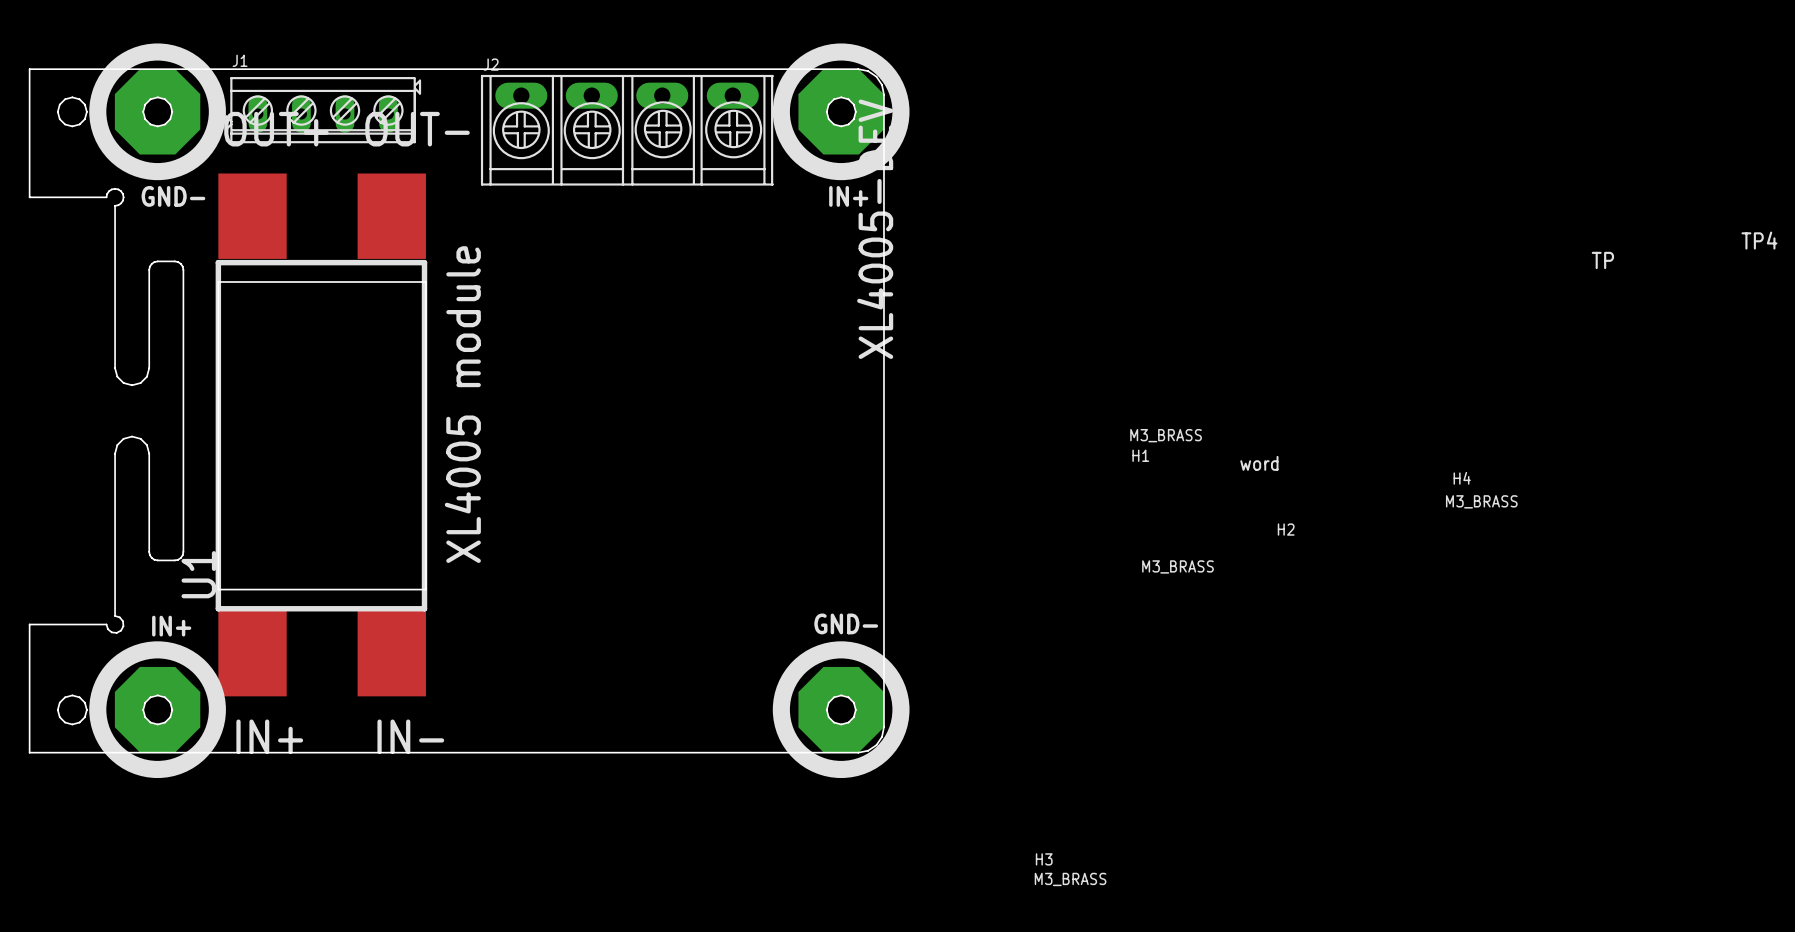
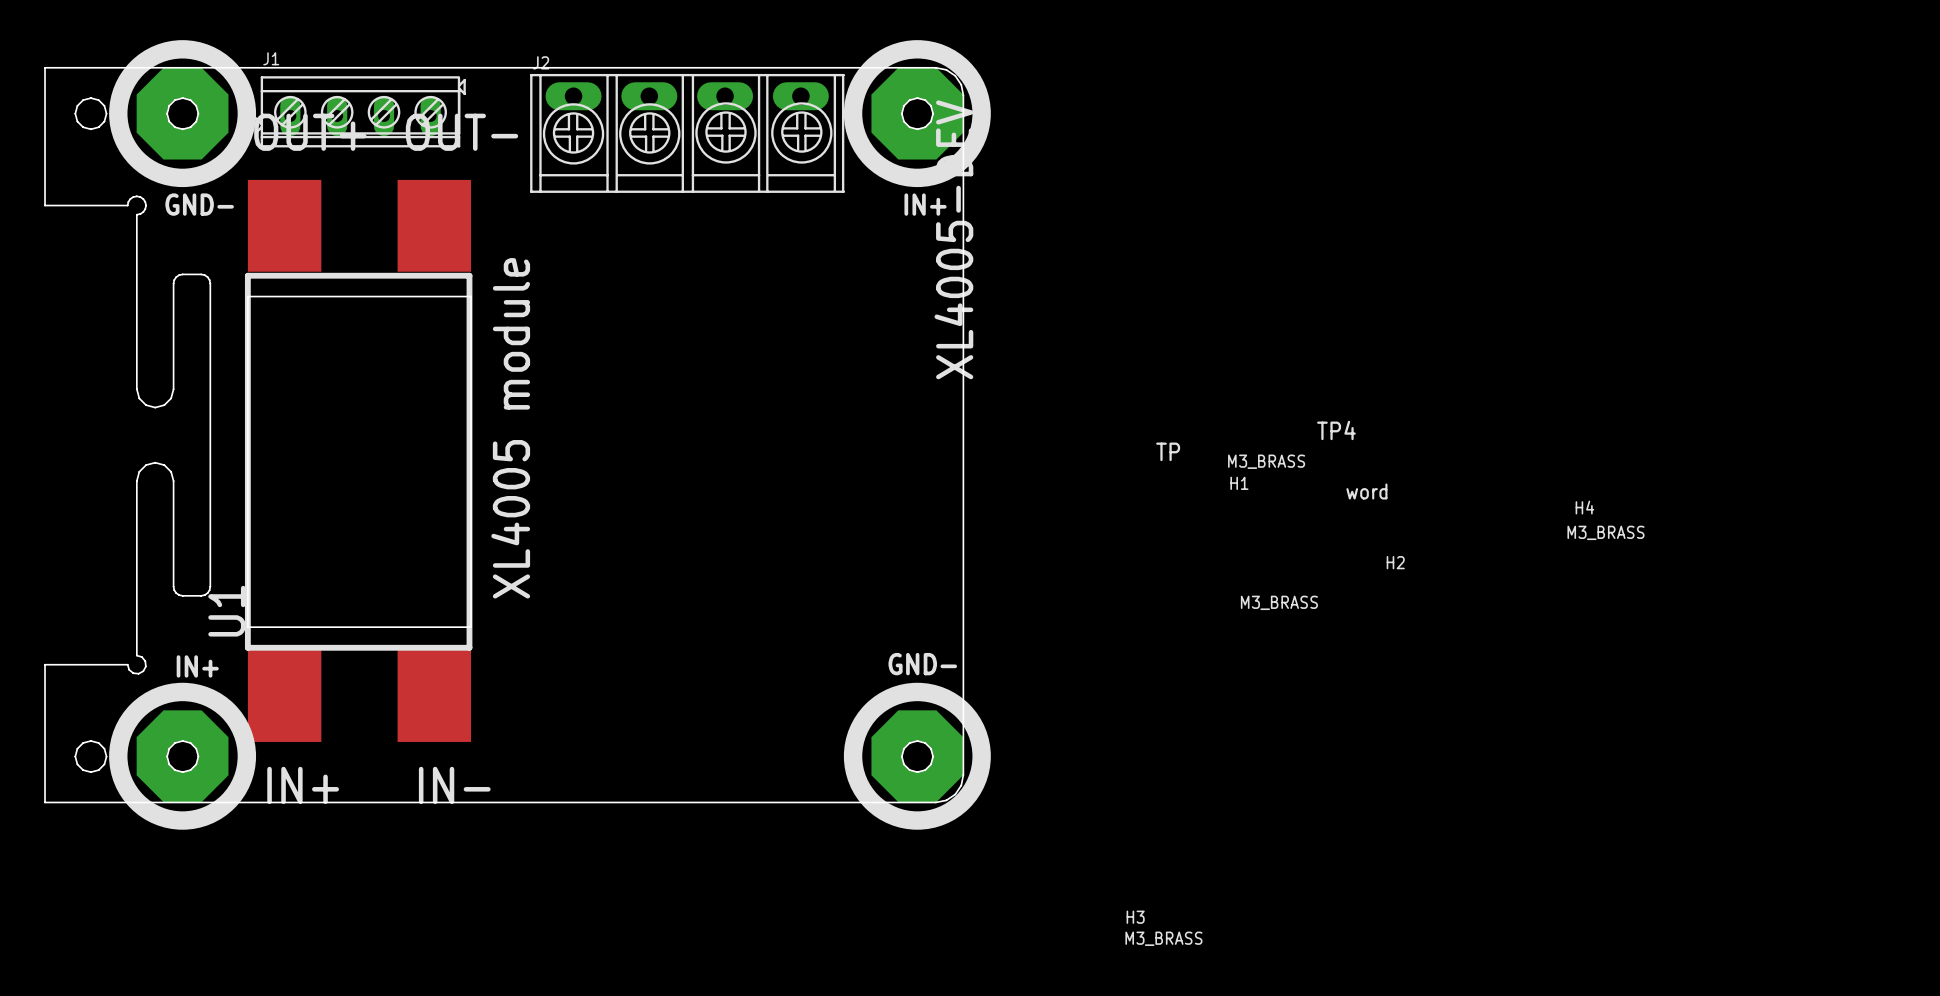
TP4 position: (1684, 250) -> (1255, 440)

